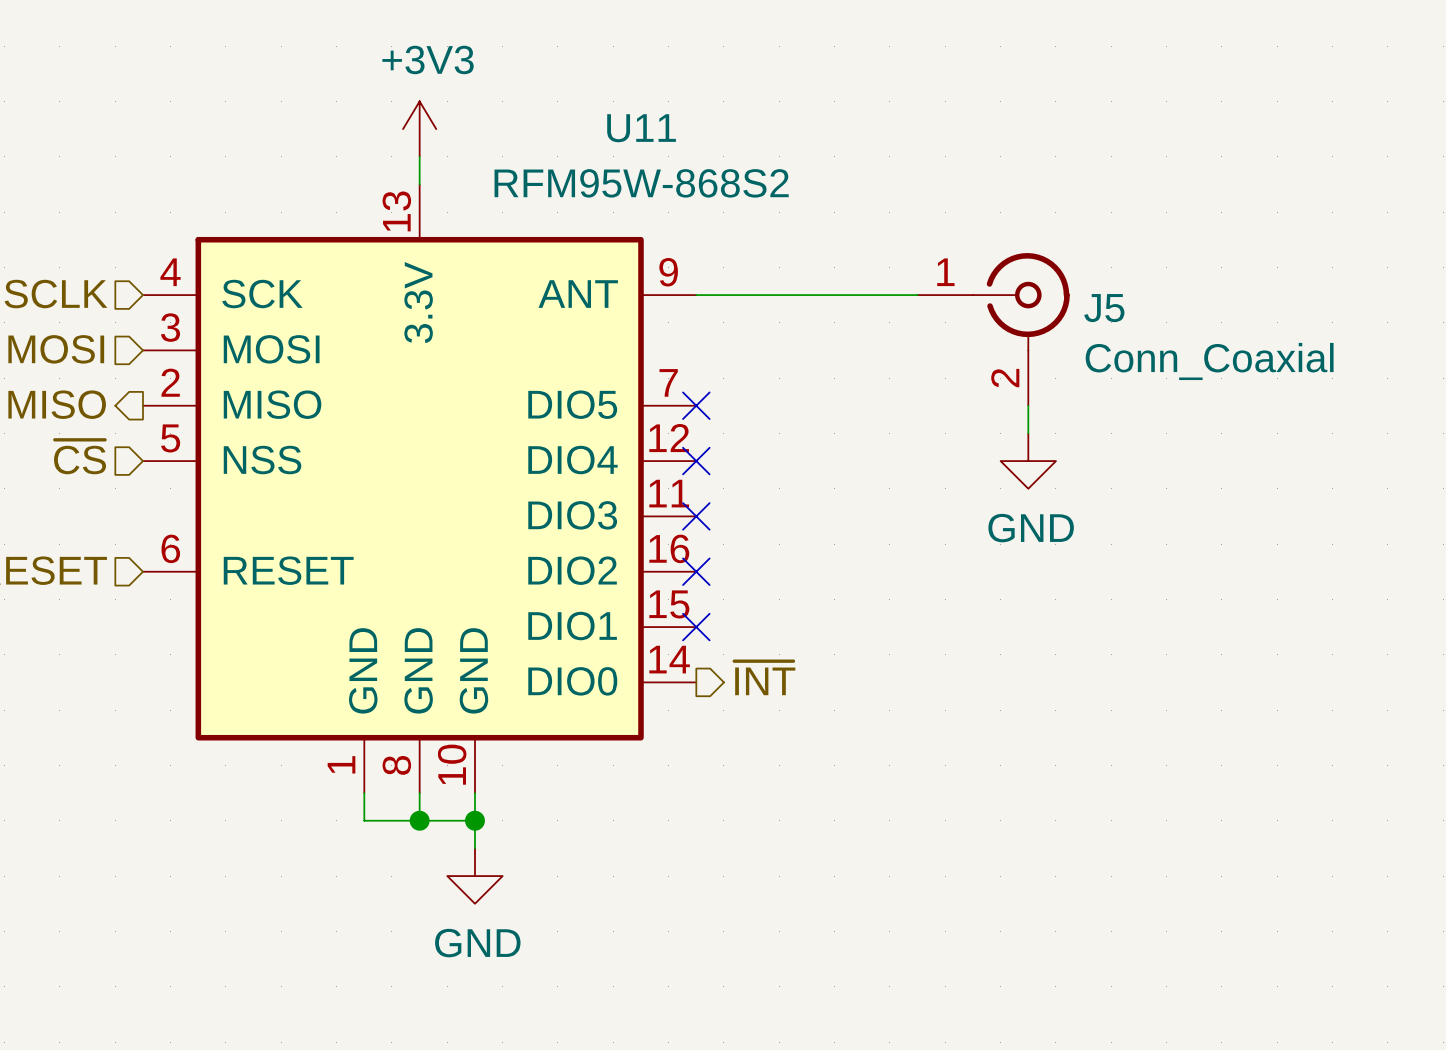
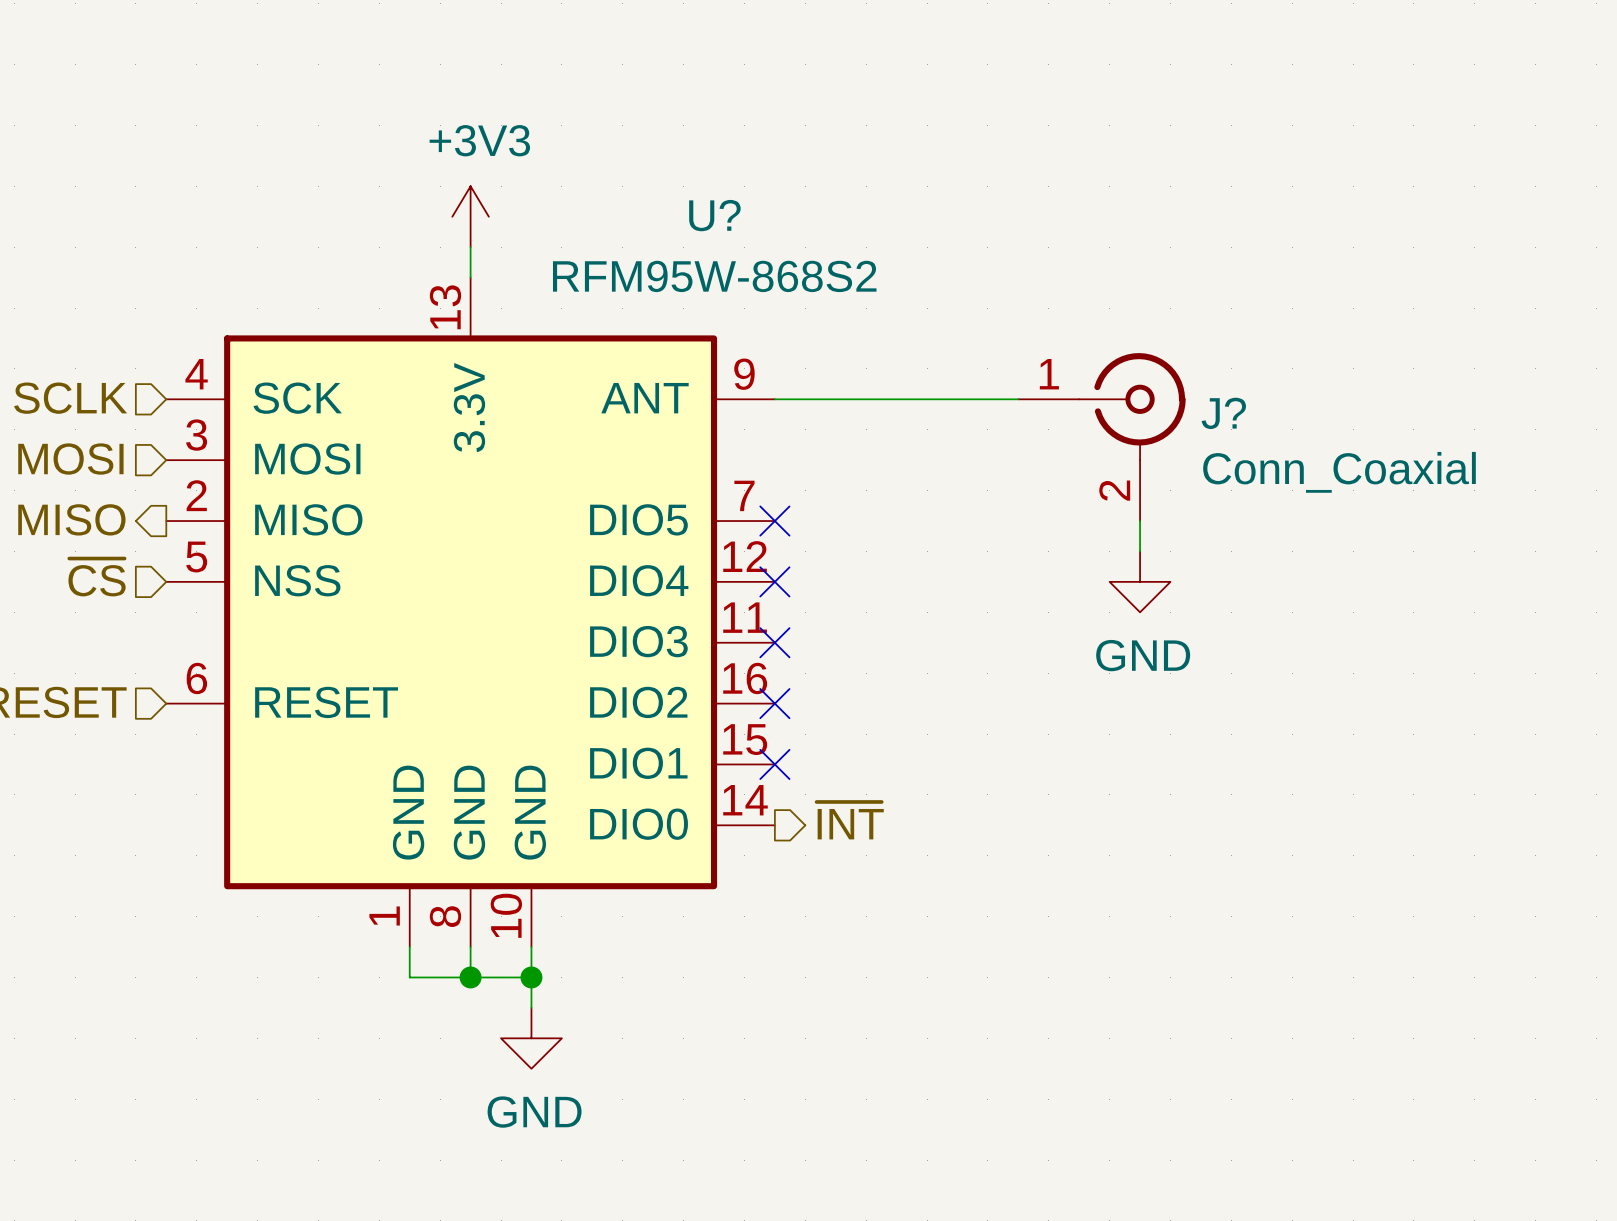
U11 name: U11 (641, 128) -> U? (714, 215)
J5 name: J5 (1104, 308) -> J? (1223, 413)

